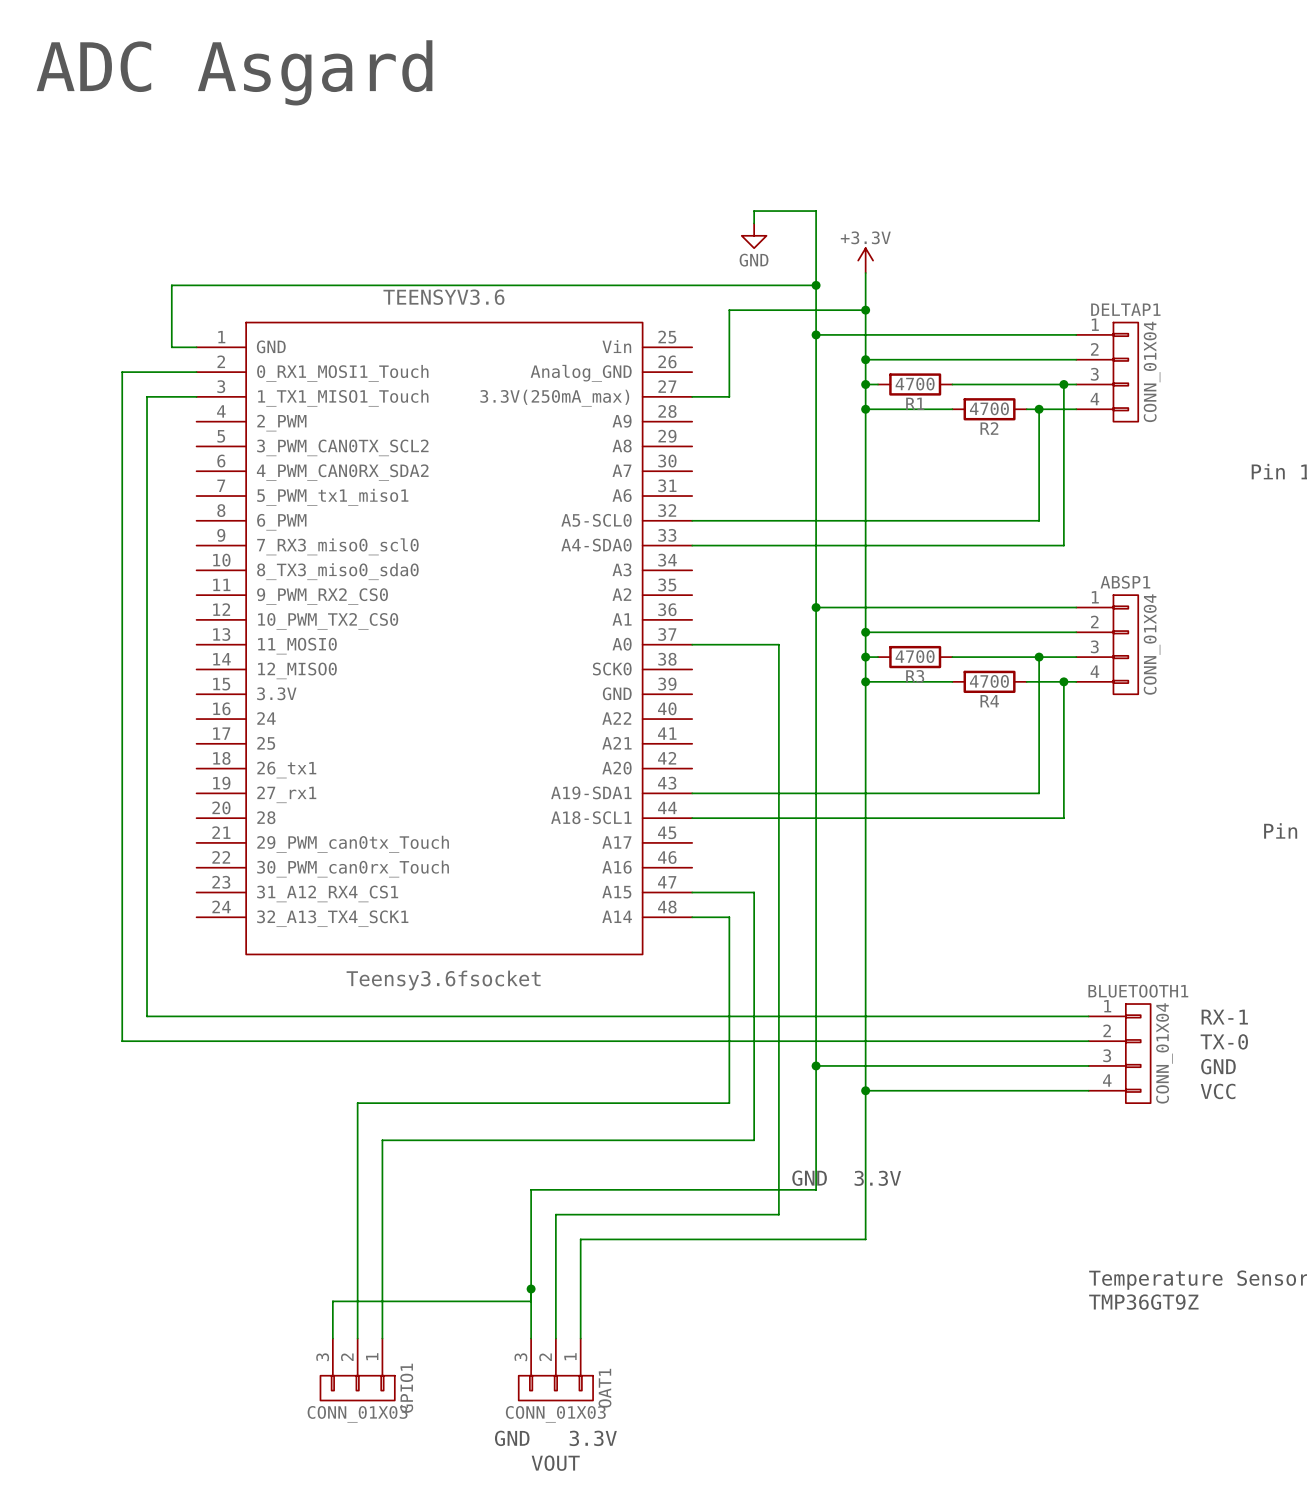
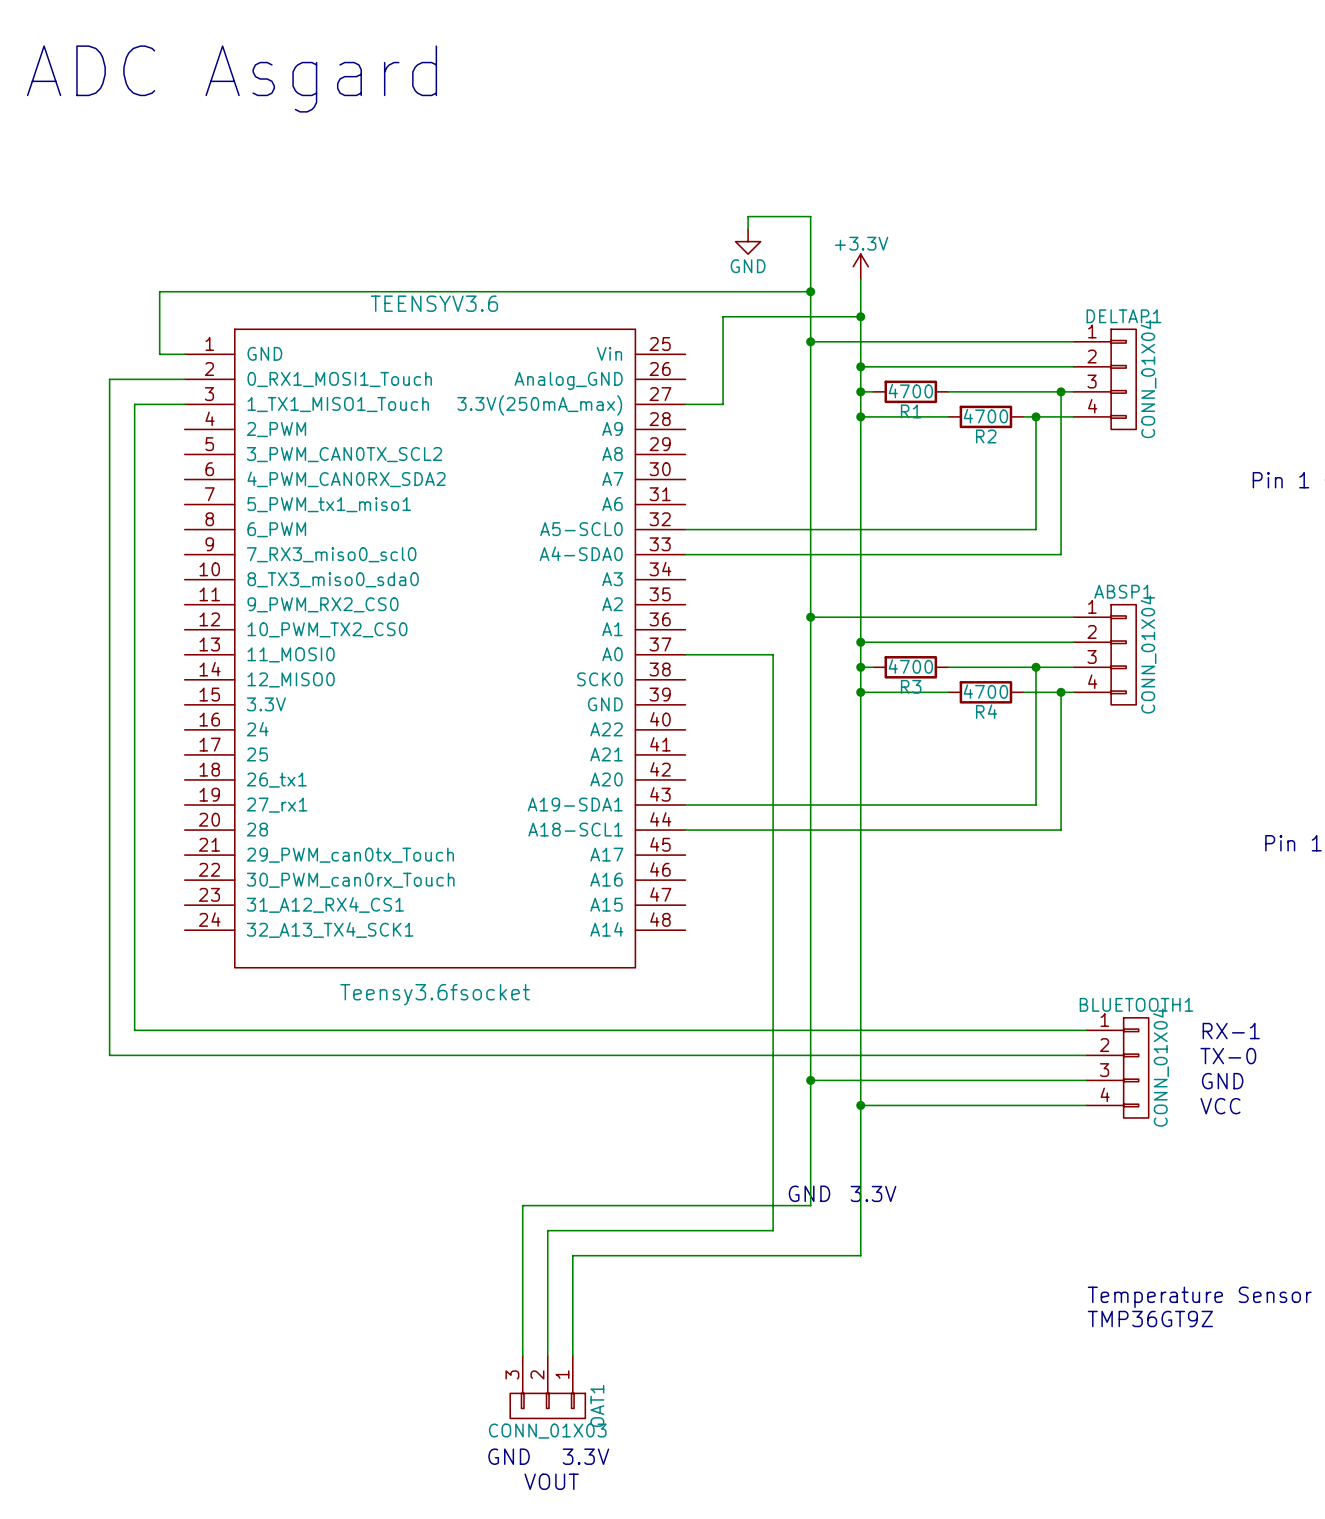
wire: (692, 892) (754, 892) (754, 1140) (382, 1140) (382, 1338) -> none
wire: (692, 917) (729, 917) (729, 1103) (357, 1103) (357, 1338) -> none
junction: (531, 1288) -> none
wire: (531, 1301) (332, 1301) (332, 1338) -> none
GPIO1: CONN_01X03 (357, 1369) -> none

